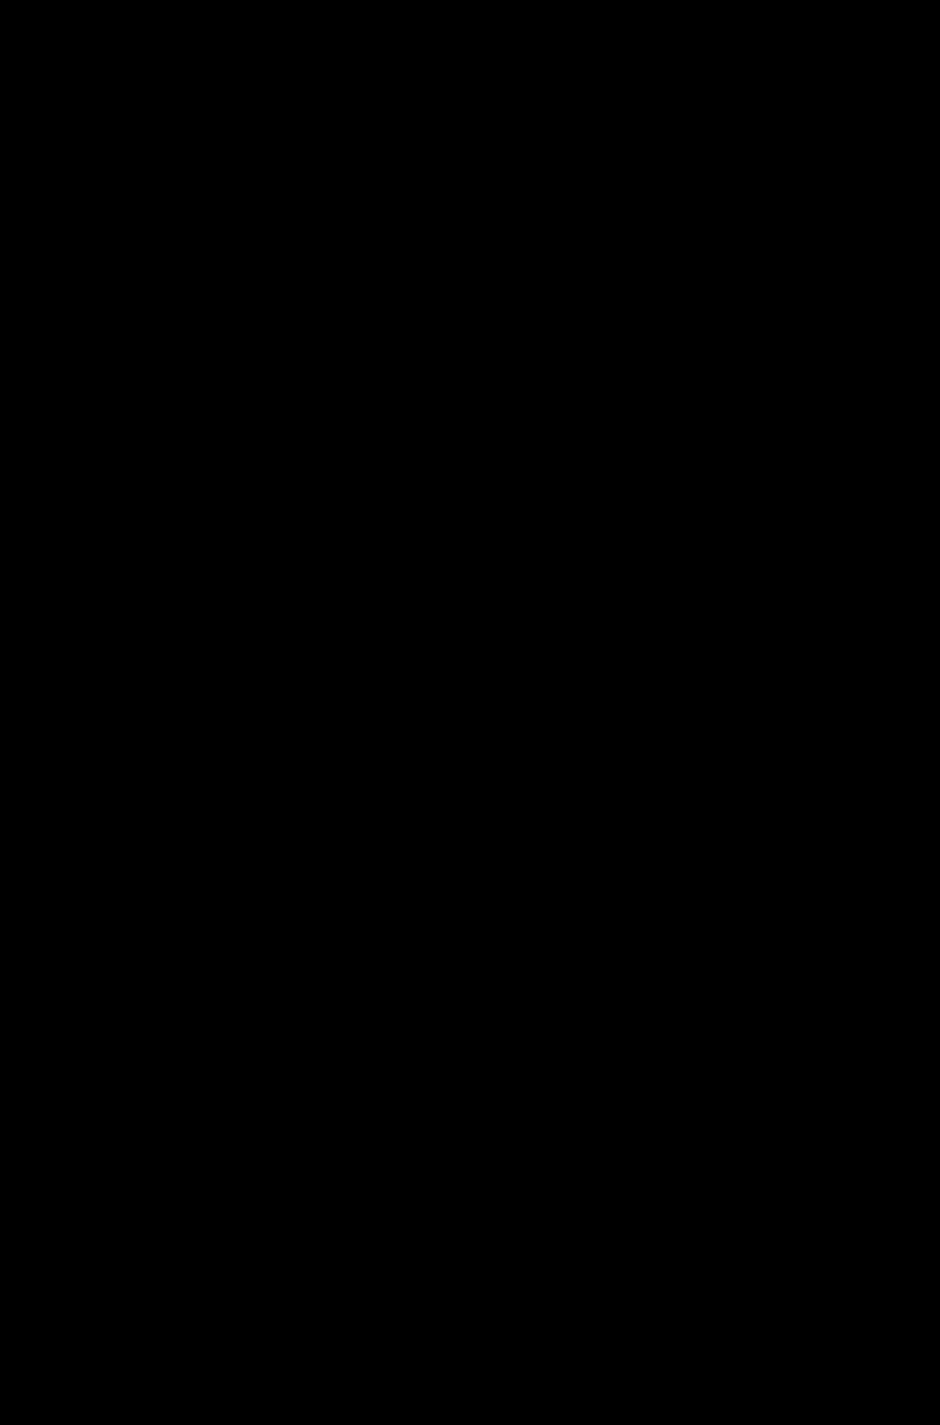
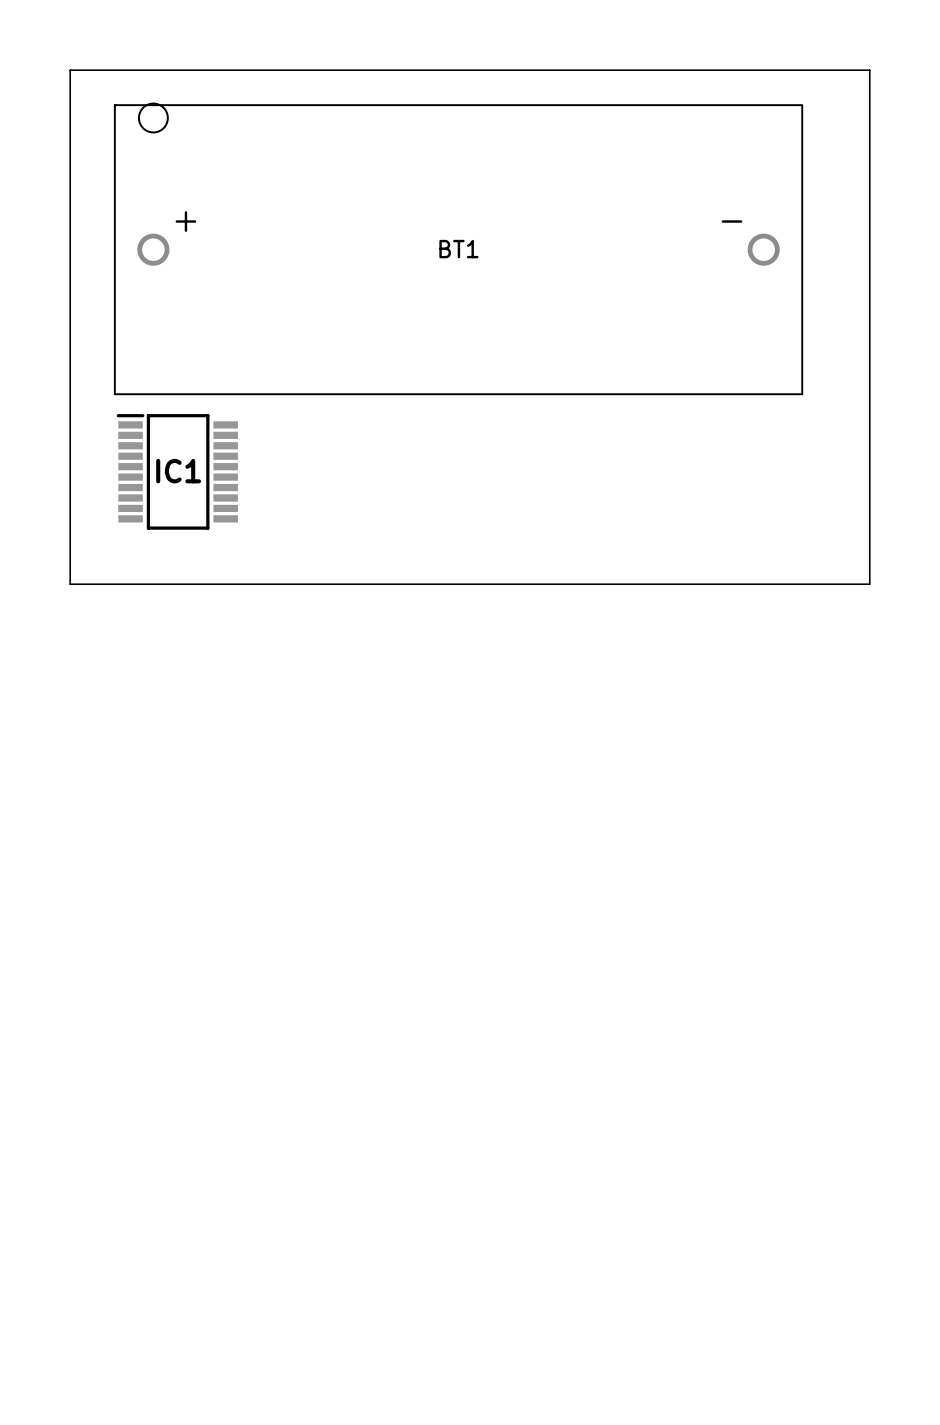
board edge: none -> (70, 70) (869, 70) (869, 584) (70, 584) (70, 70)
BT1: none -> (458, 248)
IC1: none -> (177, 471)

